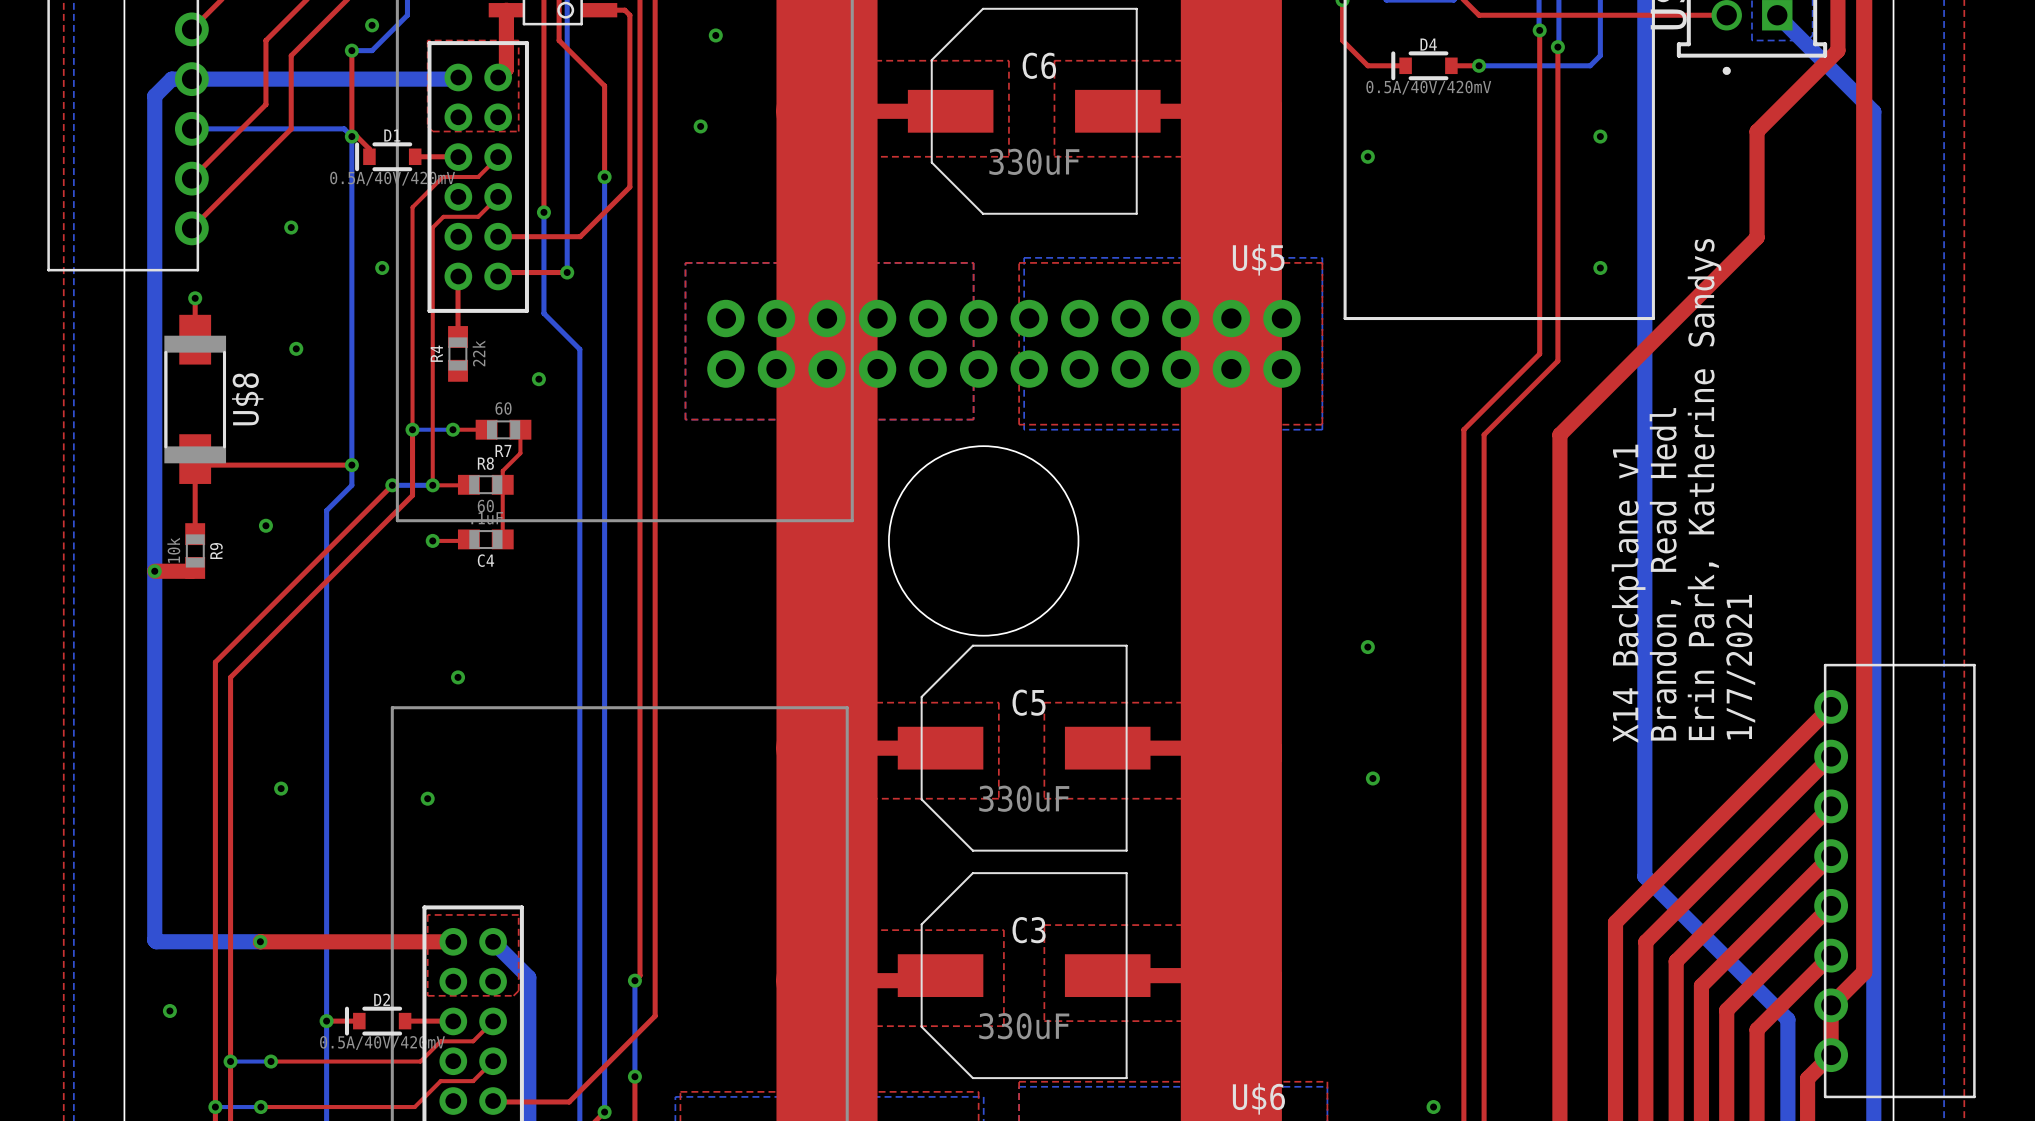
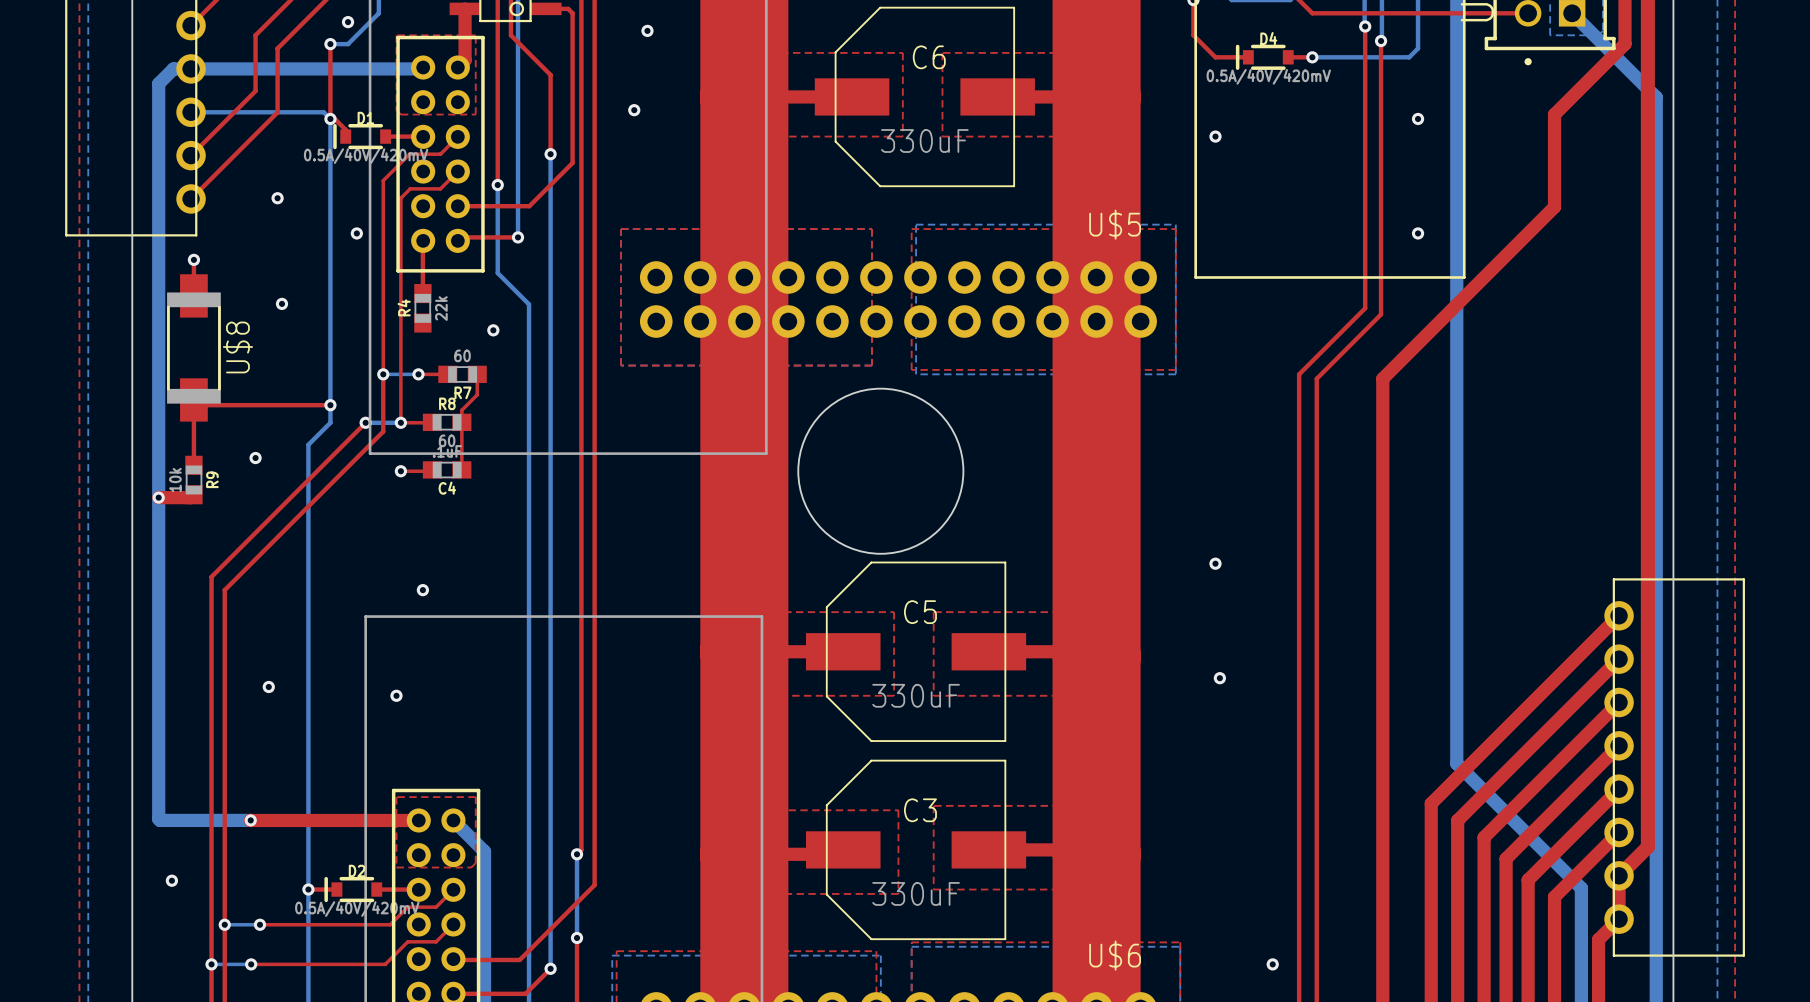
text: Erin Park, Katherine Sandys (1704, 489) -> none
text: Brandon, Read Hedl (1665, 574) -> none
text: X14 Backplane v1 (1628, 593) -> none
text: 1/7/2021 (1740, 667) -> none

